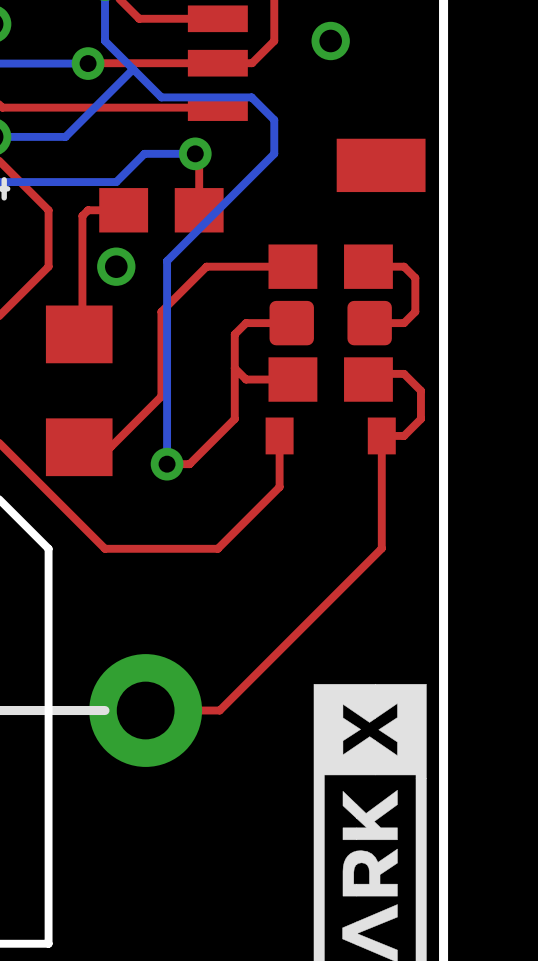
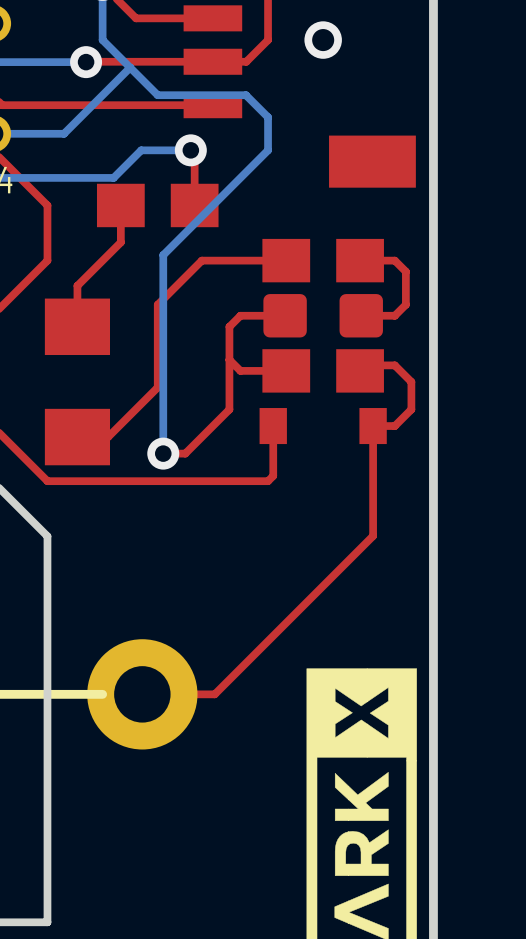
top track: (123, 210) (88, 210) (82, 215) (82, 331) (79, 334) -> (120, 205) (120, 242) (77, 285) (77, 326)
via: (116, 266) -> none
top track: (274, 492) (217, 548) (105, 548) (48, 492) -> (268, 481) (47, 481)

